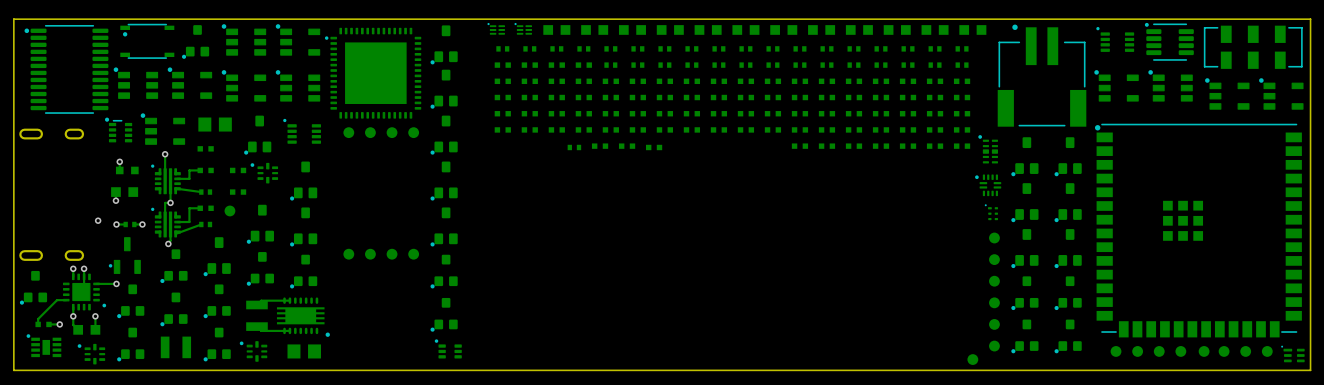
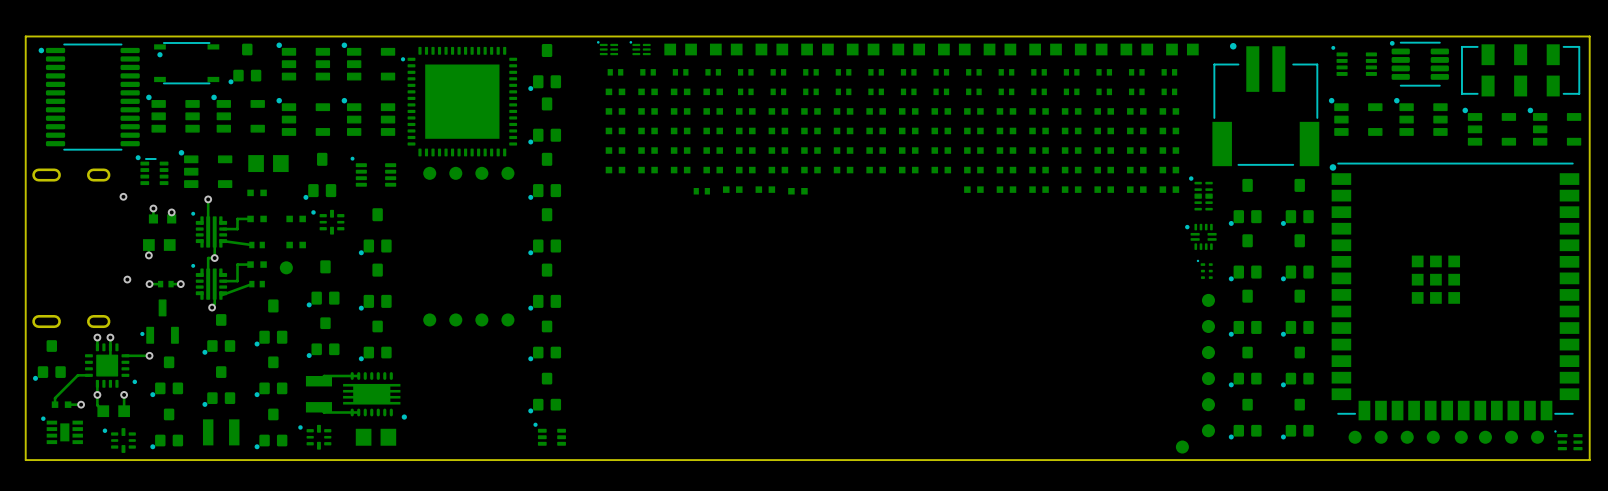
via: none -> (123, 196)
via: none -> (171, 212)

